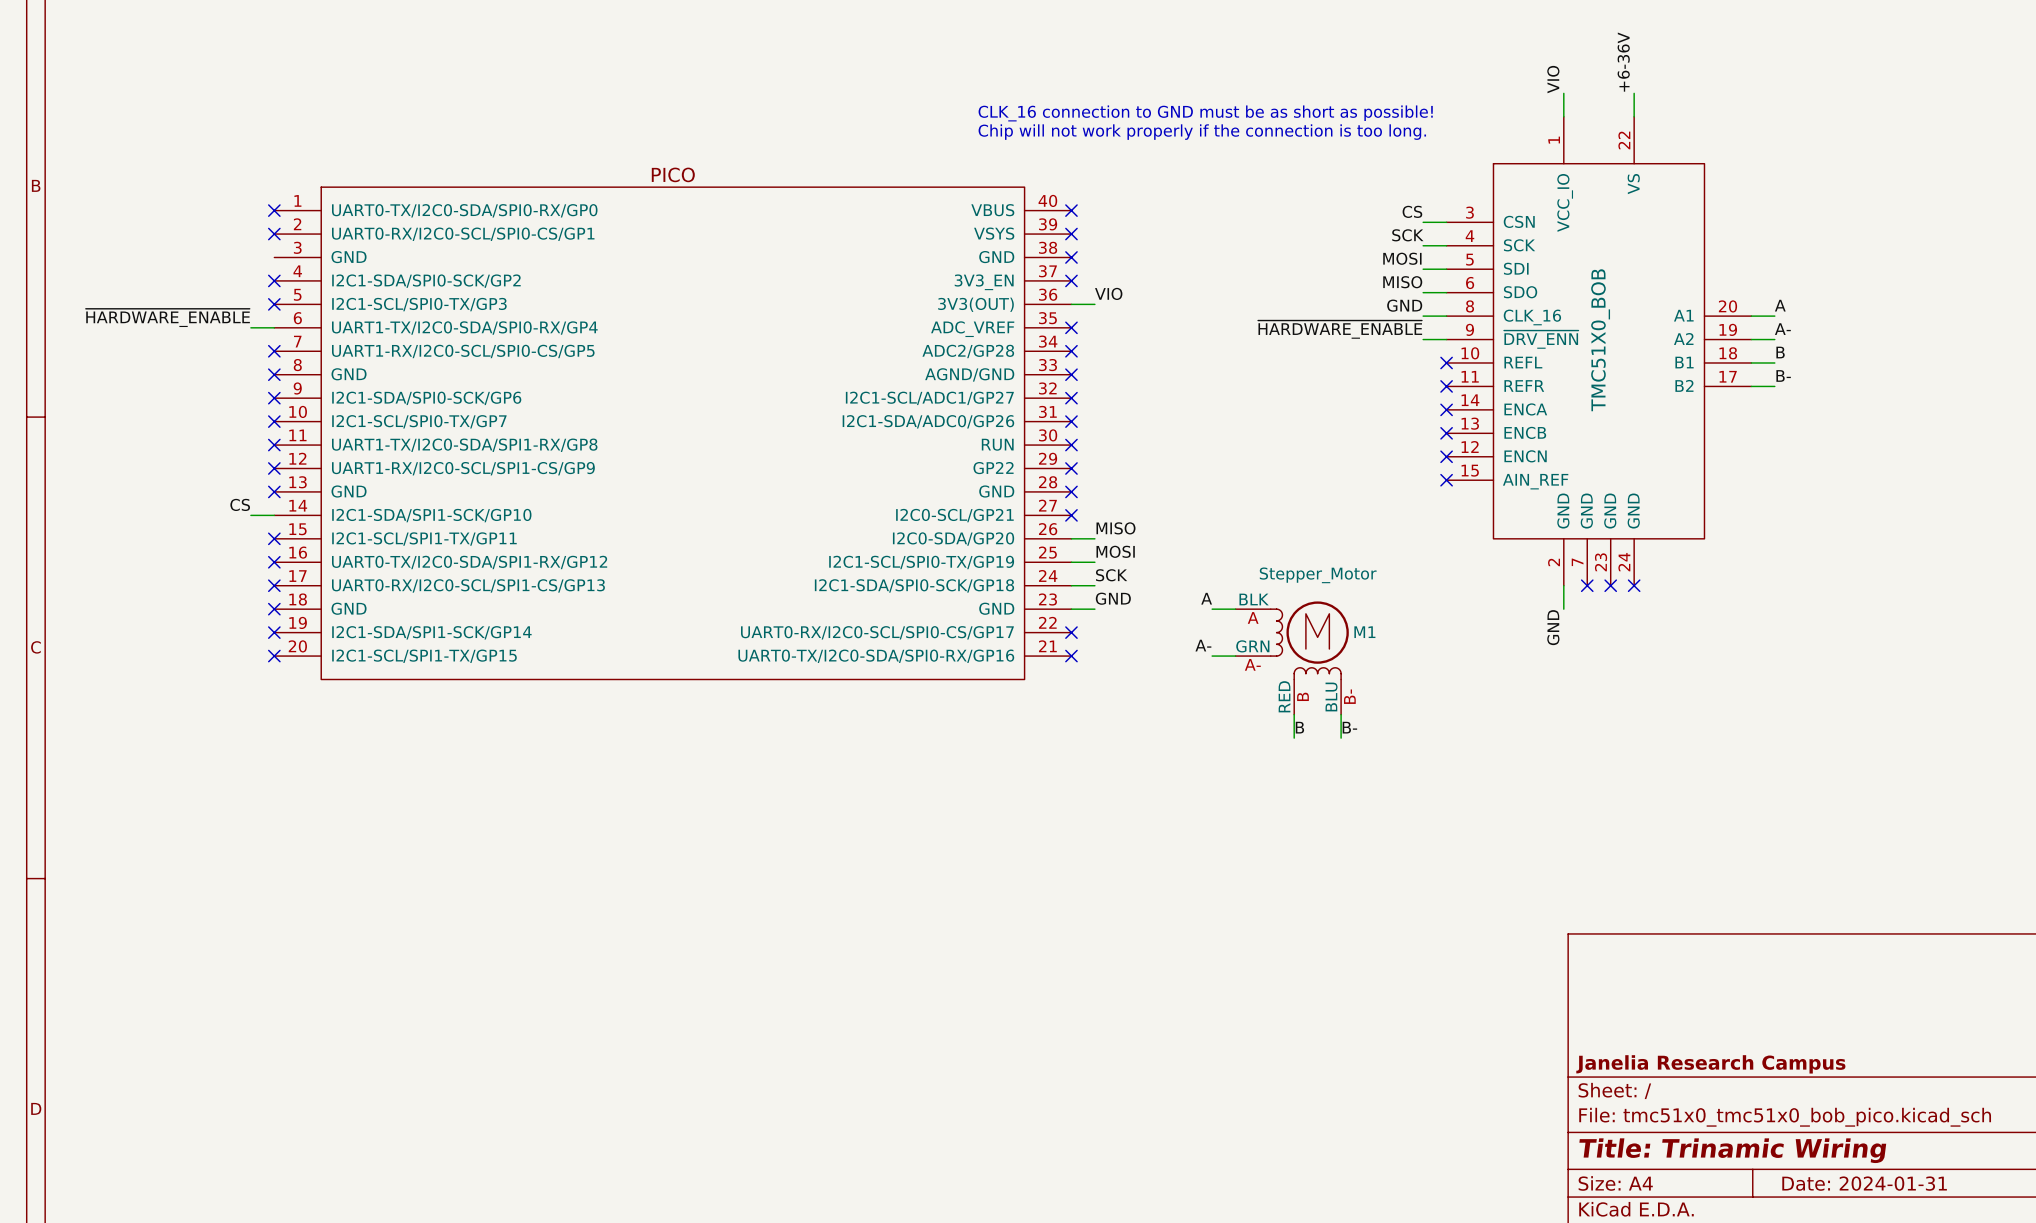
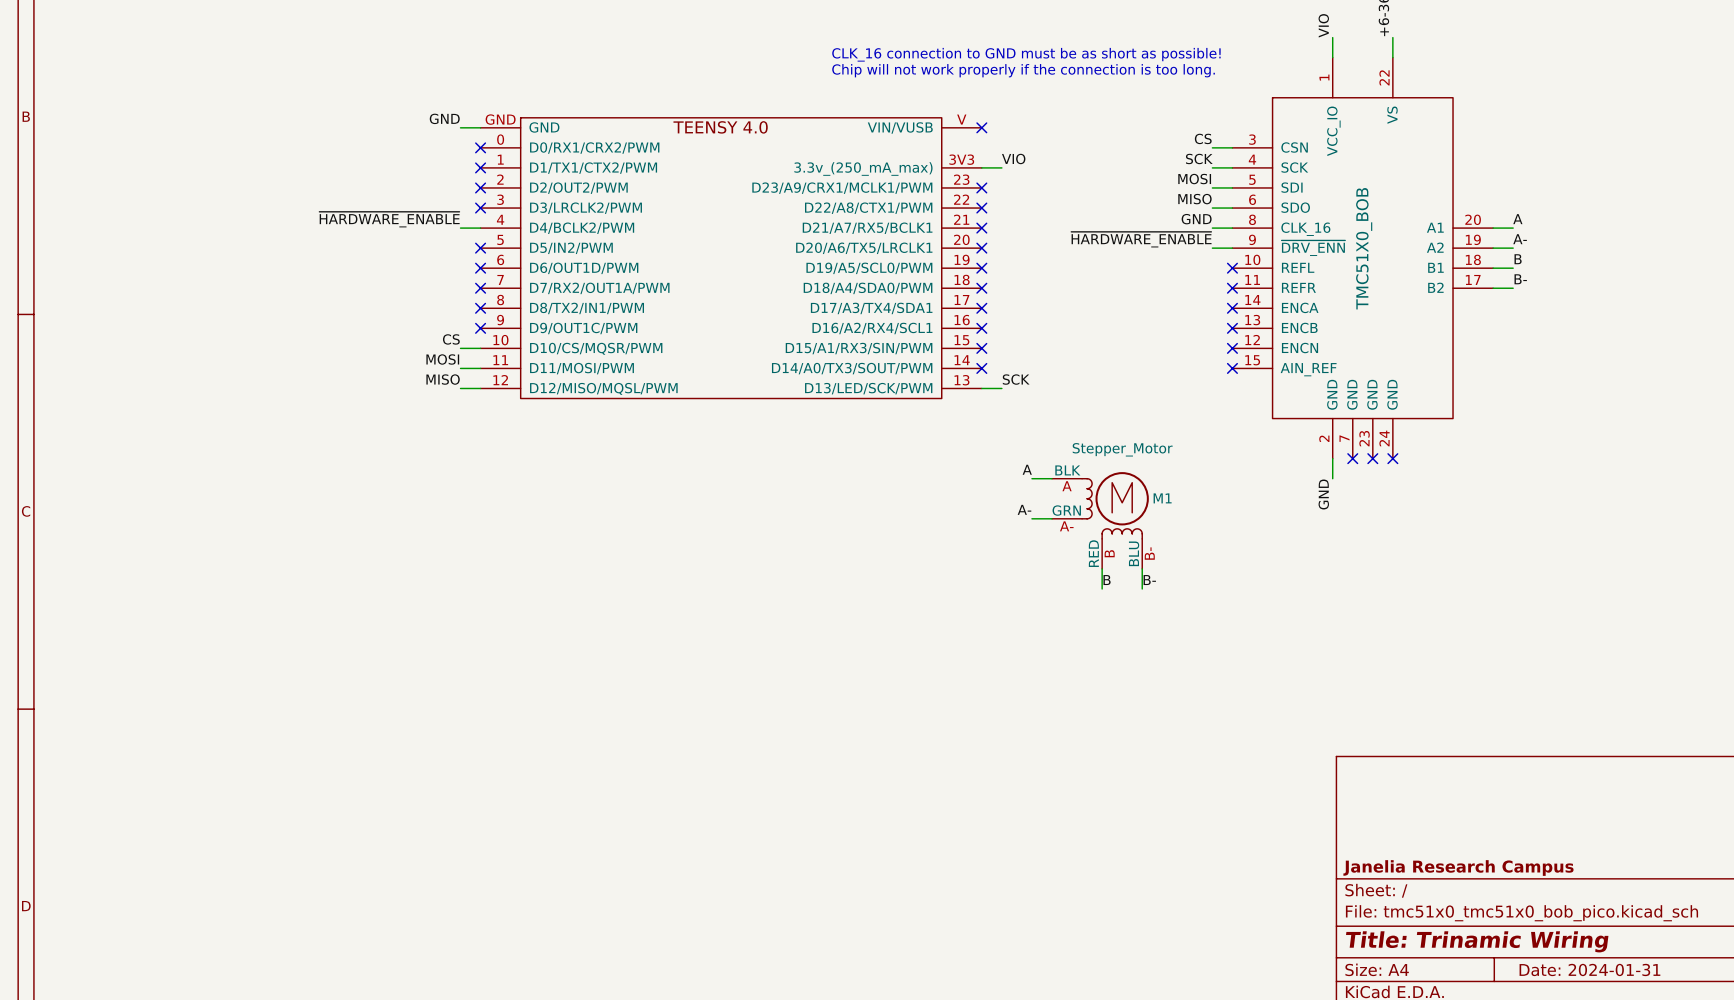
label: none -> GND (444, 118)
wire: none -> (460, 127) (480, 127)
no-connect mark: none -> (981, 127)
no-connect mark: (274, 210) -> none
no-connect mark: (1071, 210) -> none
no-connect mark: none -> (480, 147)
no-connect mark: (274, 234) -> none
no-connect mark: (1071, 234) -> none
no-connect mark: none -> (480, 167)
no-connect mark: (1071, 257) -> none
no-connect mark: none -> (480, 187)
no-connect mark: none -> (981, 187)
no-connect mark: (274, 280) -> none
no-connect mark: (1071, 280) -> none
no-connect mark: none -> (480, 208)
no-connect mark: none -> (981, 208)
label position: VIO (1108, 293) -> VIO (1013, 158)
no-connect mark: (274, 304) -> none
wire: (1071, 304) (1094, 304) -> (981, 167) (1001, 167)
label: none -> ~{HARDWARE_ENABLE} (389, 219)
wire: none -> (460, 228) (480, 228)
no-connect mark: none -> (981, 228)
label: ~{HARDWARE_ENABLE} (167, 317) -> none
wire: (250, 327) (274, 327) -> none
no-connect mark: (1071, 327) -> none
no-connect mark: none -> (480, 248)
no-connect mark: none -> (981, 248)
no-connect mark: (274, 351) -> none
part: none -> (731, 258)
no-connect mark: (1071, 351) -> none
no-connect mark: none -> (480, 268)
no-connect mark: none -> (981, 268)
no-connect mark: (274, 374) -> none
no-connect mark: (1071, 374) -> none
no-connect mark: none -> (480, 288)
no-connect mark: none -> (981, 288)
no-connect mark: (274, 398) -> none
no-connect mark: (1071, 398) -> none
no-connect mark: none -> (480, 308)
no-connect mark: none -> (981, 308)
no-connect mark: (274, 421) -> none
no-connect mark: (1071, 421) -> none
no-connect mark: none -> (480, 328)
part: (672, 433) -> none
no-connect mark: none -> (981, 328)
no-connect mark: (274, 445) -> none
no-connect mark: (1071, 445) -> none
label: none -> CS (451, 339)
wire: none -> (460, 348) (480, 348)
no-connect mark: none -> (981, 348)
no-connect mark: (274, 468) -> none
no-connect mark: (1071, 468) -> none
label: none -> MOSI (442, 359)
wire: none -> (460, 368) (480, 368)
no-connect mark: none -> (981, 368)
no-connect mark: (274, 491) -> none
no-connect mark: (1071, 491) -> none
label: none -> MISO (443, 379)
wire: none -> (460, 388) (480, 388)
label: CS (240, 504) -> none
wire: (250, 515) (274, 515) -> none
no-connect mark: (1071, 515) -> none
label: MISO (1115, 528) -> none
no-connect mark: (274, 538) -> none
wire: (1071, 538) (1094, 538) -> none
label: MOSI (1115, 551) -> none
no-connect mark: (274, 562) -> none
wire: (1071, 562) (1094, 562) -> (981, 388) (1001, 388)
label position: SCK (1111, 575) -> SCK (1016, 379)
no-connect mark: (274, 585) -> none
wire: (1071, 585) (1094, 585) -> none
label: GND (1113, 598) -> none
no-connect mark: (274, 609) -> none
wire: (1071, 609) (1094, 609) -> none
no-connect mark: (274, 632) -> none
no-connect mark: (1071, 632) -> none
no-connect mark: (274, 656) -> none
no-connect mark: (1071, 656) -> none

